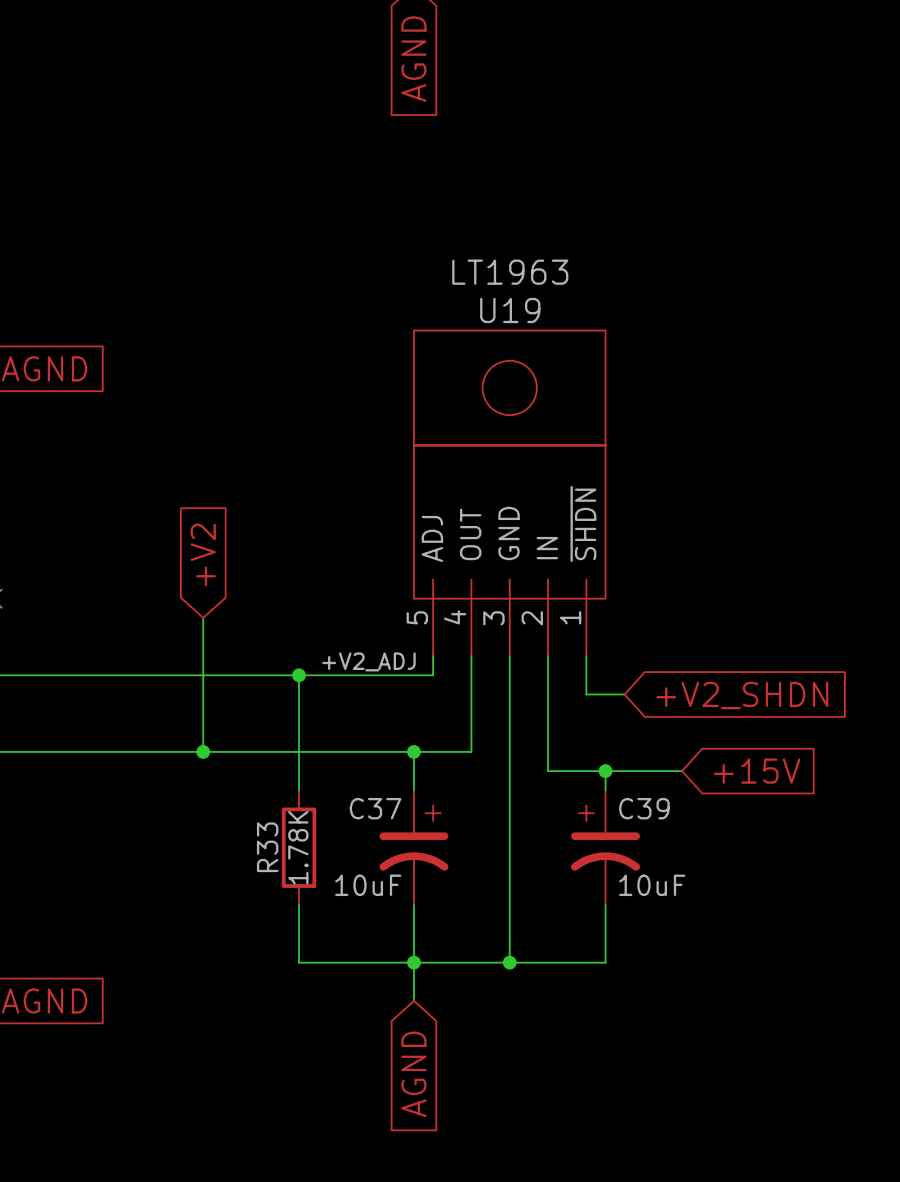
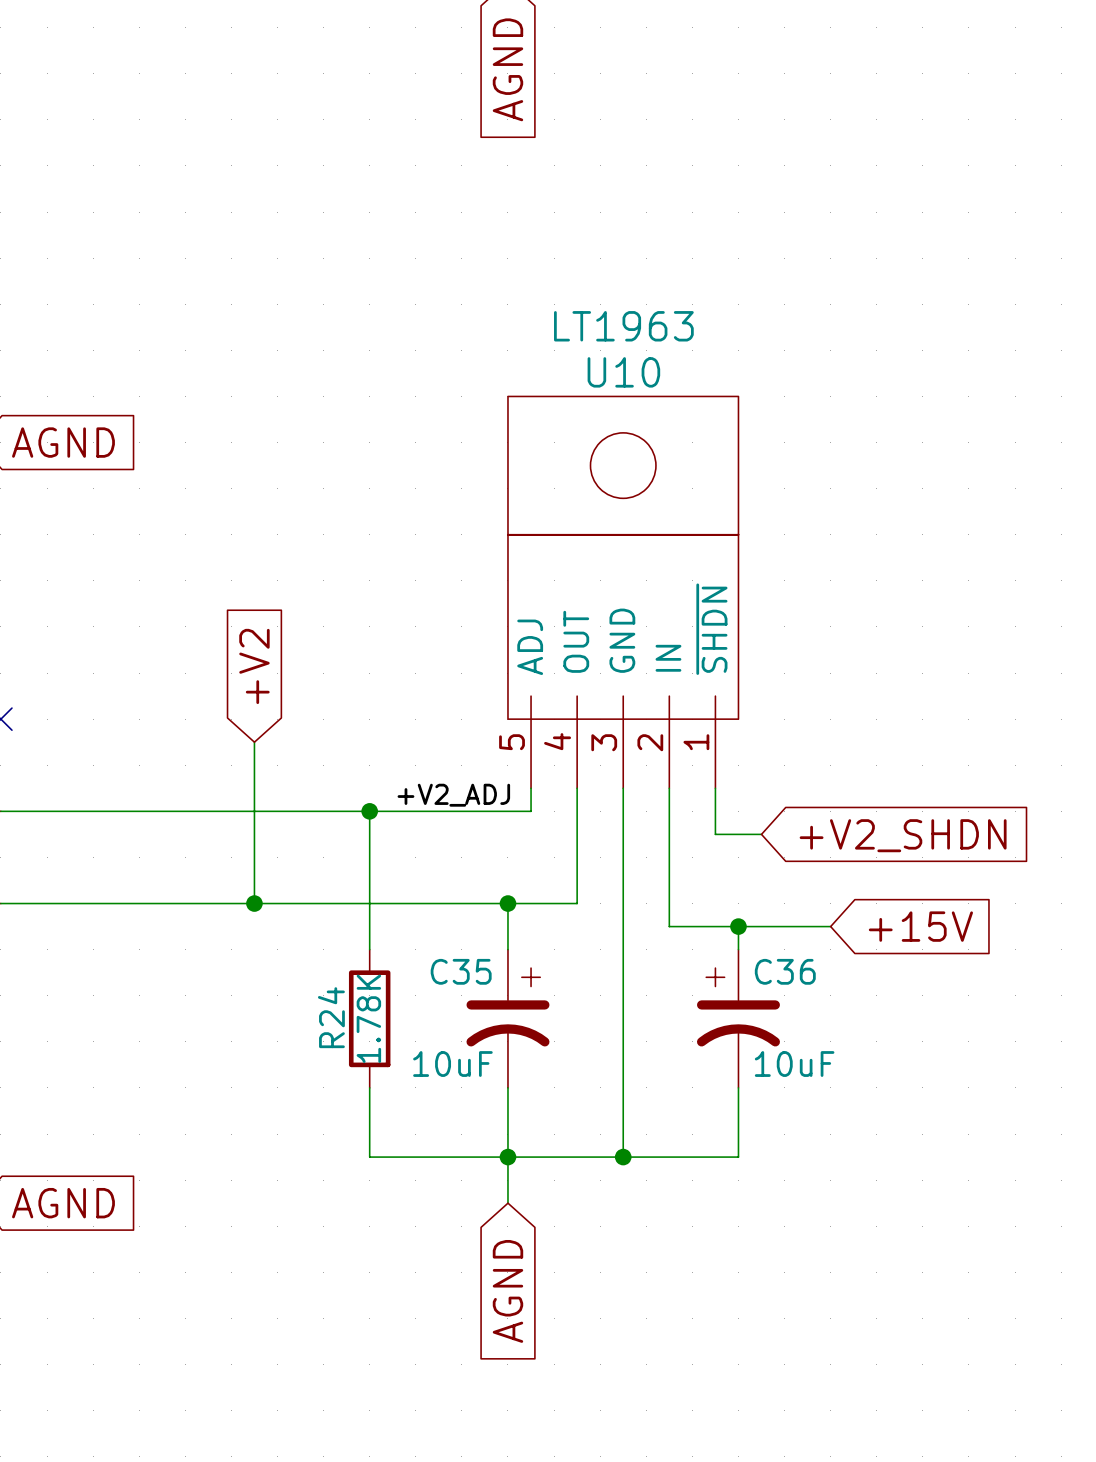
U19 name: U19 (510, 310) -> U10 (623, 372)
C37 name: C37 (375, 808) -> C35 (461, 971)
C39 name: C39 (644, 808) -> C36 (785, 971)
R33 name: R33 (267, 847) -> R24 (331, 1017)

